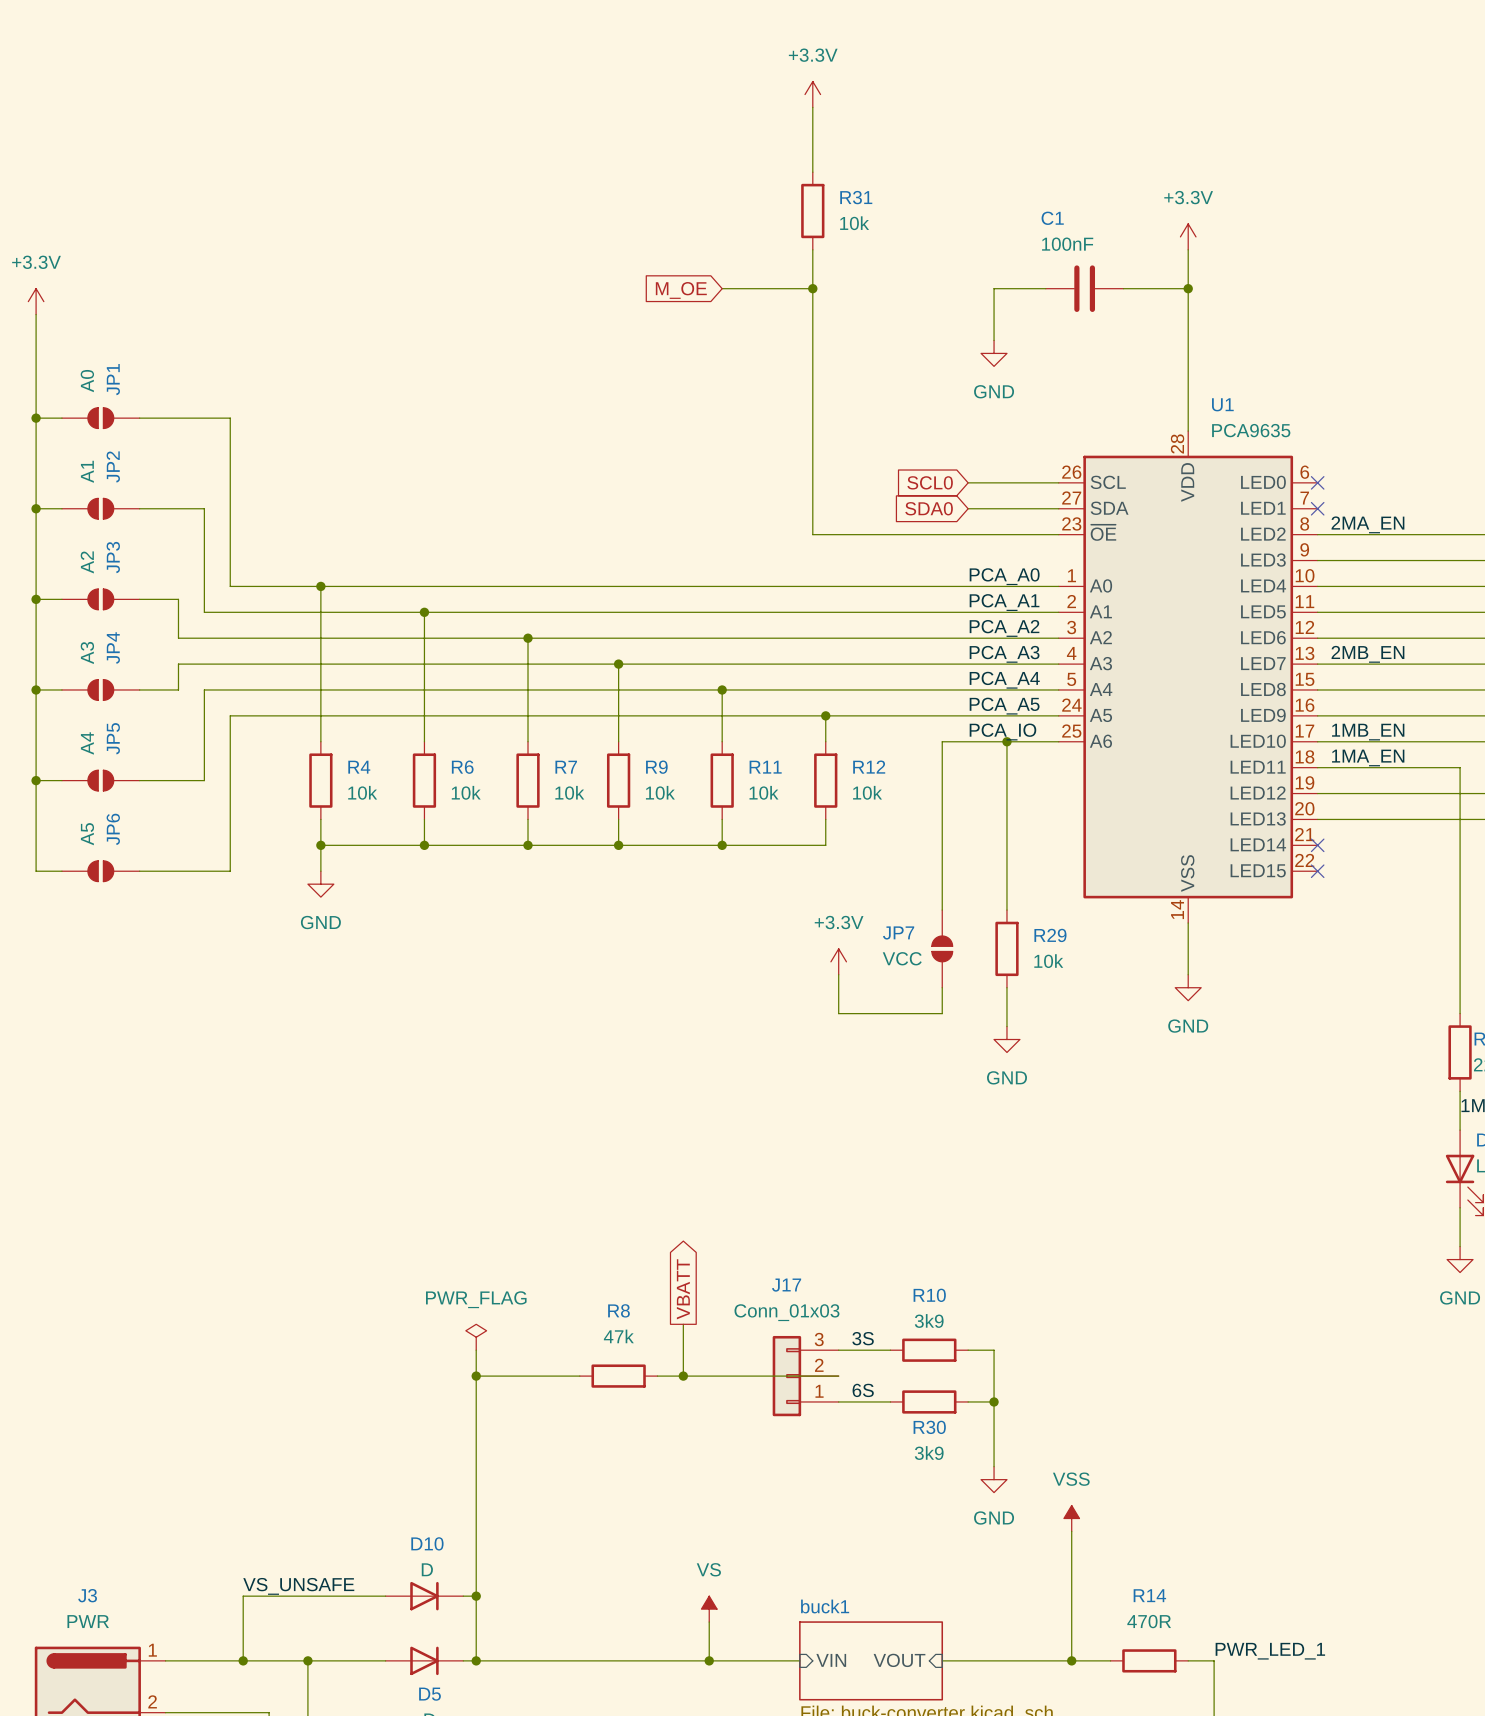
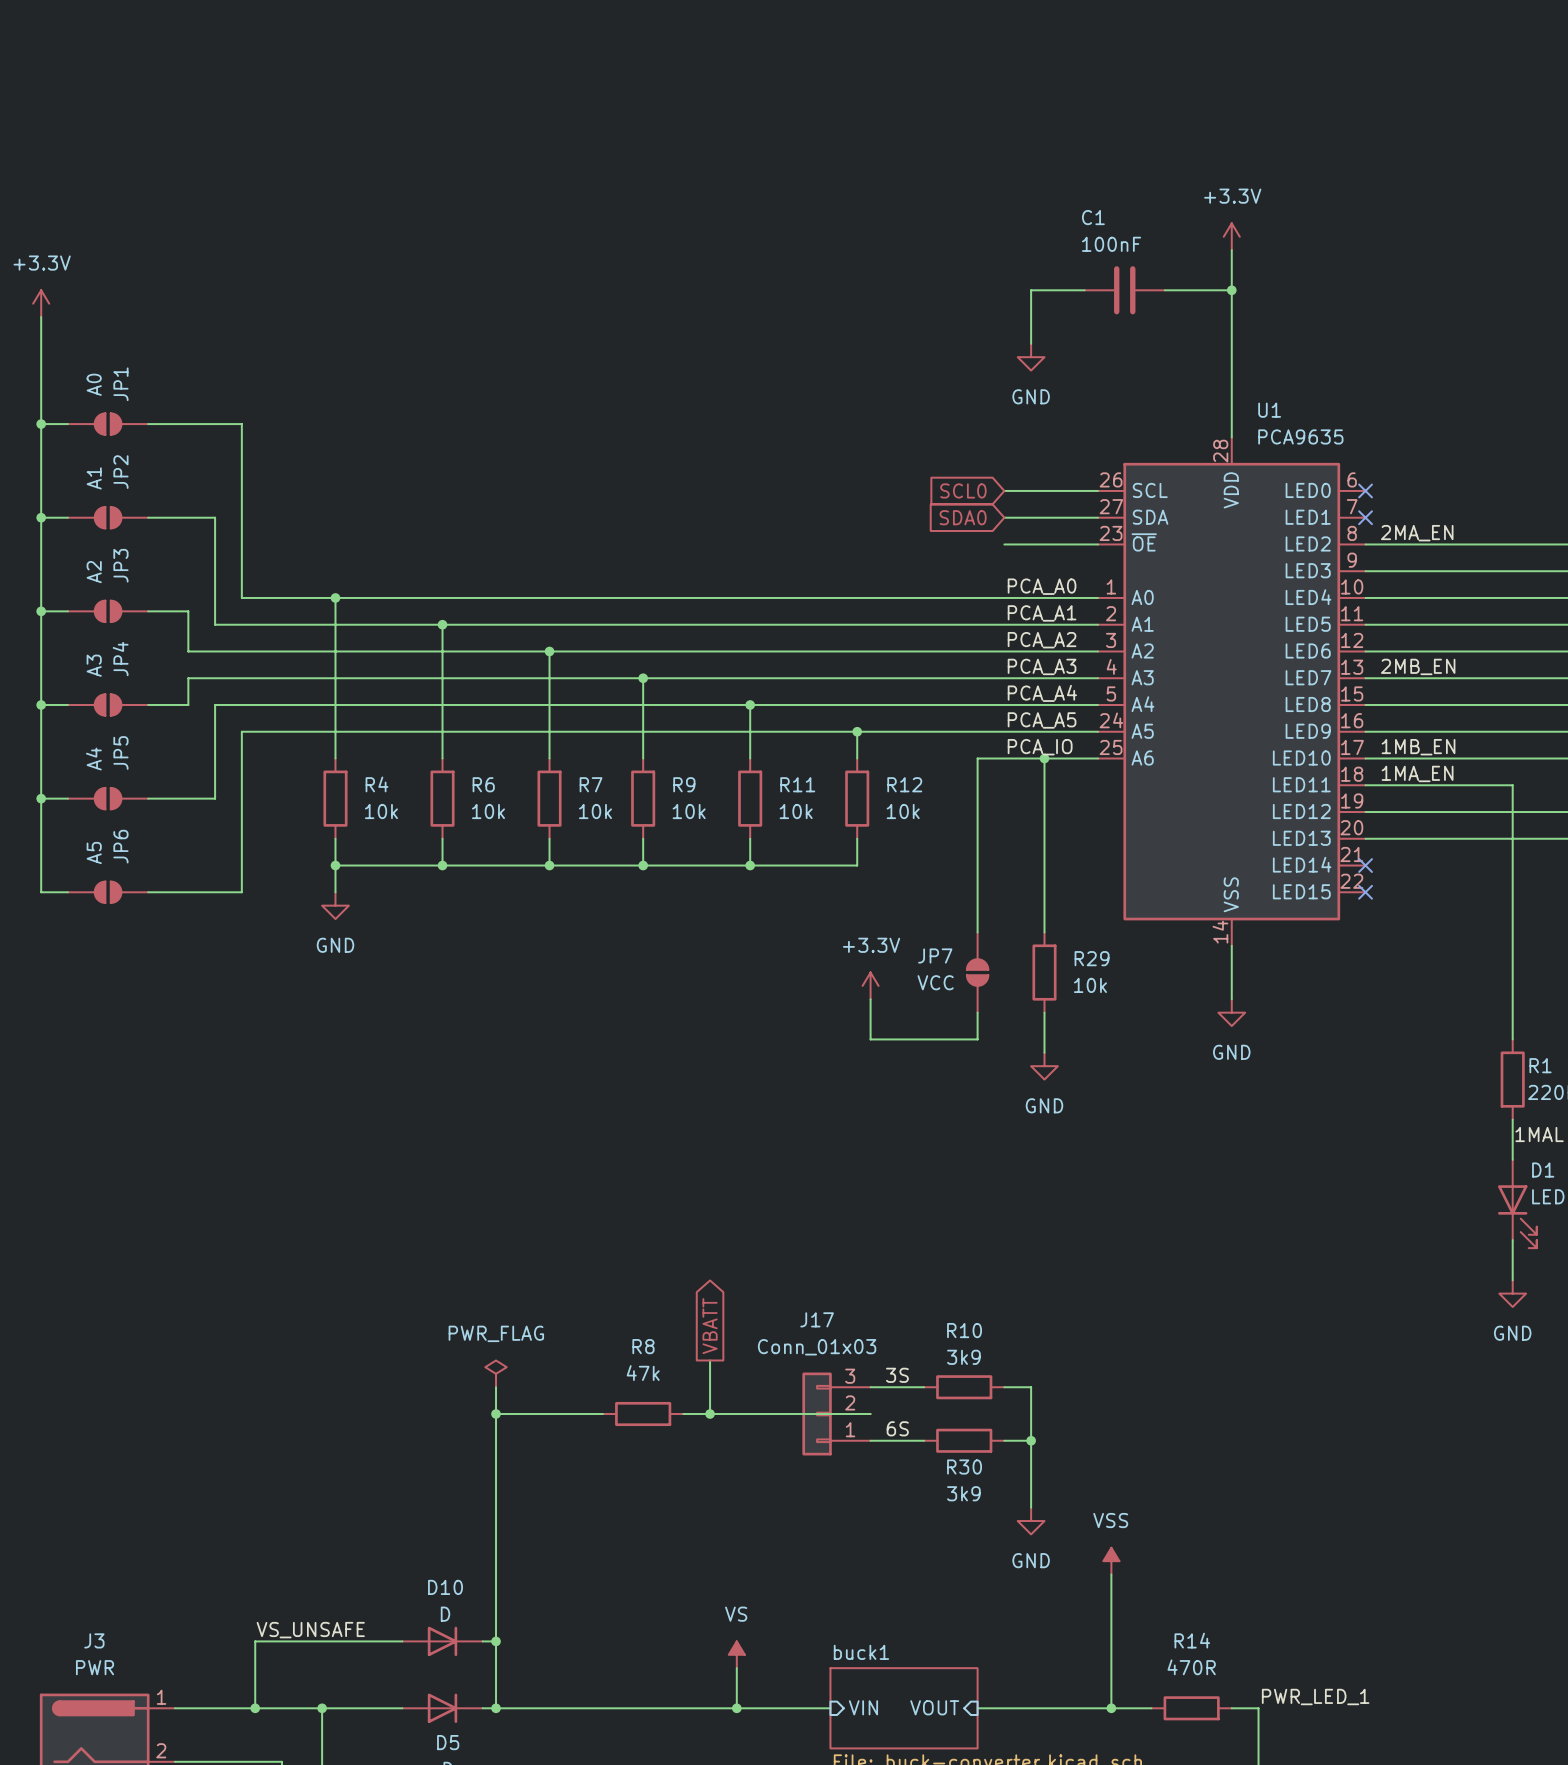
power symbol: +3.3V (812, 94) -> none
wire: (812, 107) (812, 172) -> none
R31: 10k (812, 211) -> none
wire: (812, 249) (812, 534) (968, 534) -> none
wire: (722, 288) (812, 288) -> none
junction: (812, 288) -> none
global label: M_OE (681, 290) -> none

